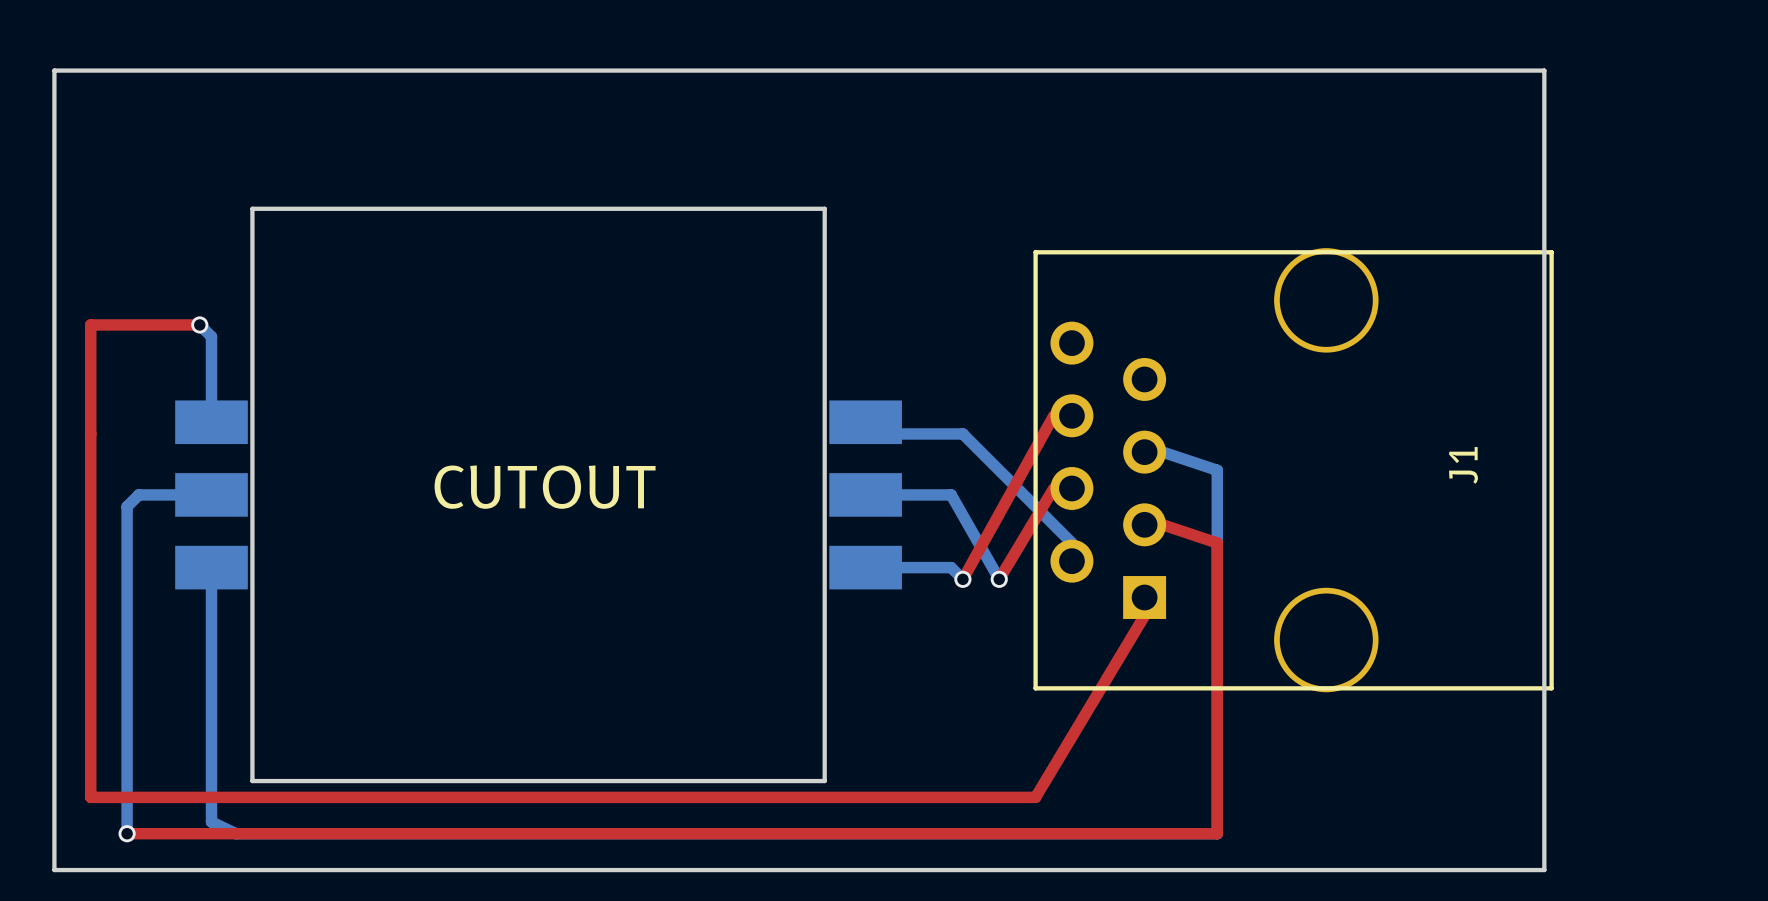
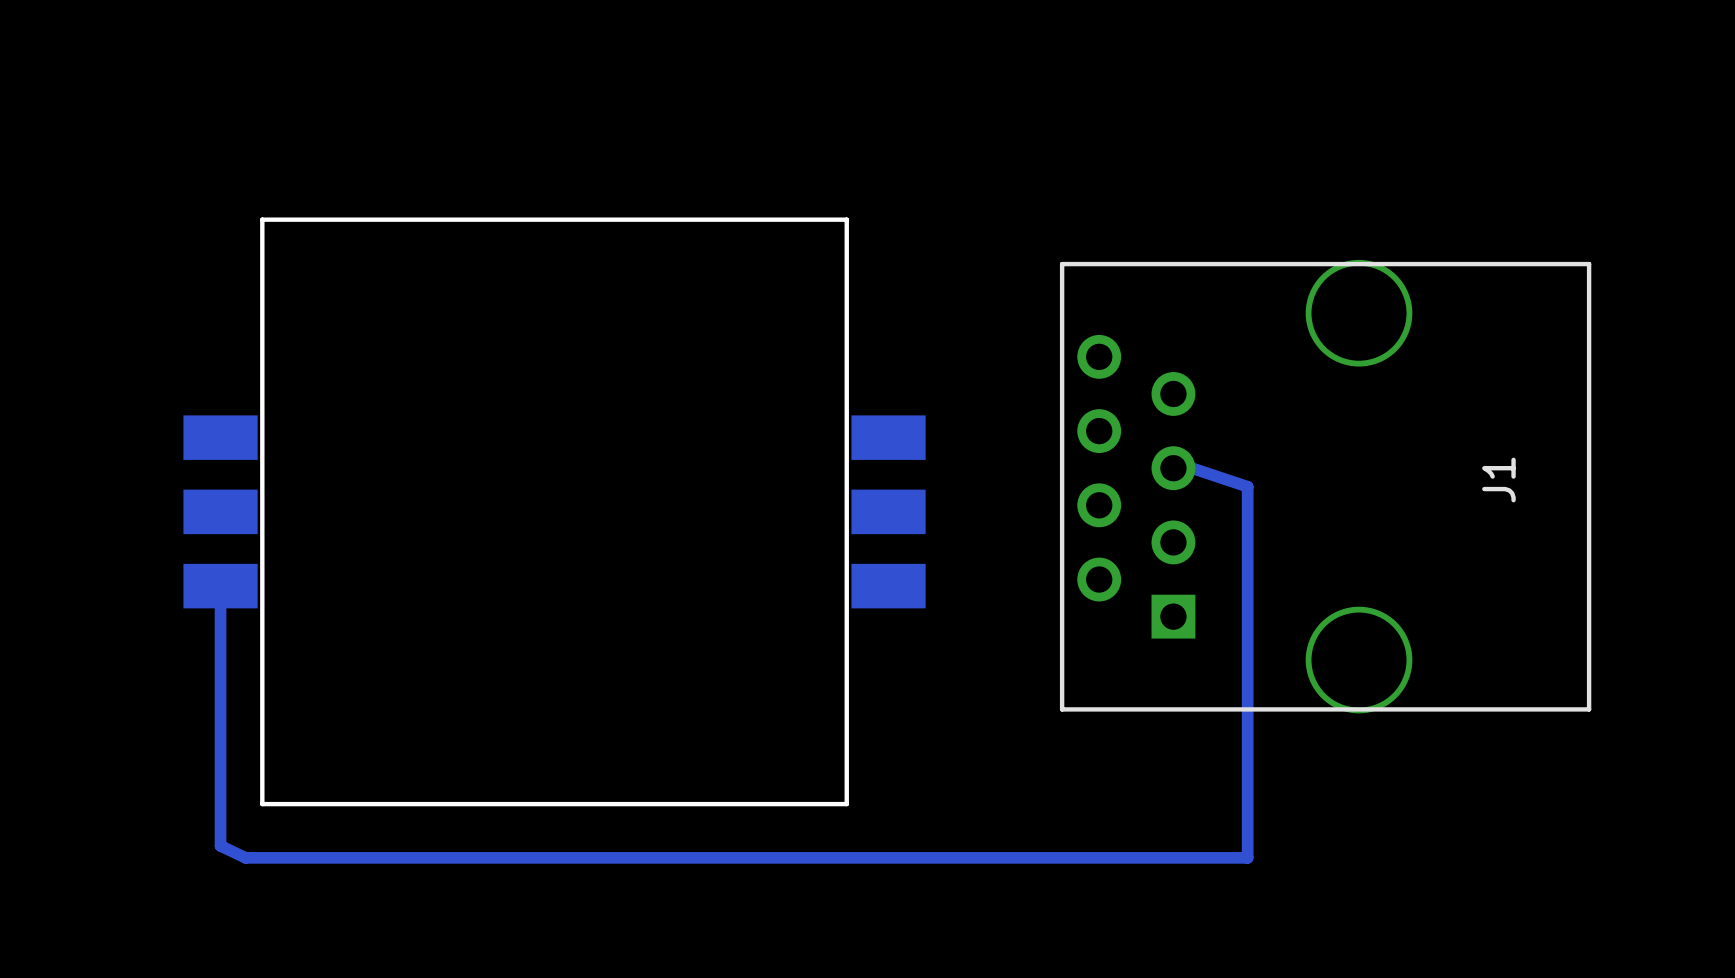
board edge: (54, 70) (54, 870) (1544, 870) (1544, 70) (54, 70) -> none
top track: (199, 324) (90, 324) (90, 797) (1035, 797) (1144, 615) (1144, 597) -> none
bottom track: (199, 324) (211, 336) (211, 422) -> none
via: (199, 324) -> none
top track: (1071, 415) (1053, 415) (962, 579) -> none
bottom track: (865, 422) (877, 433) (962, 433) (1071, 542) (1071, 561) -> none
text: CUTOUT (545, 487) -> none
top track: (1071, 488) (1053, 488) (999, 579) -> none
bottom track: (211, 494) (138, 494) (127, 506) (127, 833) -> none
bottom track: (865, 494) (951, 494) (999, 579) -> none
top track: (1144, 524) (1162, 524) (1217, 542) (1217, 833) (127, 833) -> none
bottom track: (878, 567) (865, 567) (951, 567) (962, 579) -> none
via: (962, 579) -> none
via: (999, 579) -> none
via: (127, 833) -> none

